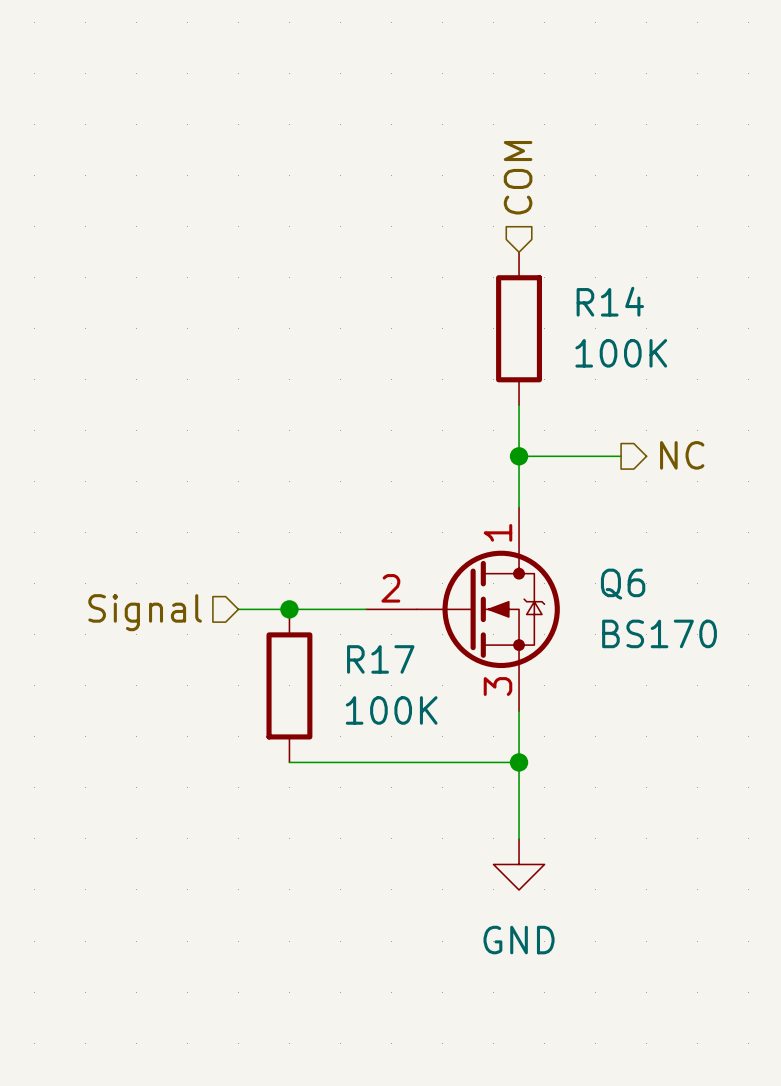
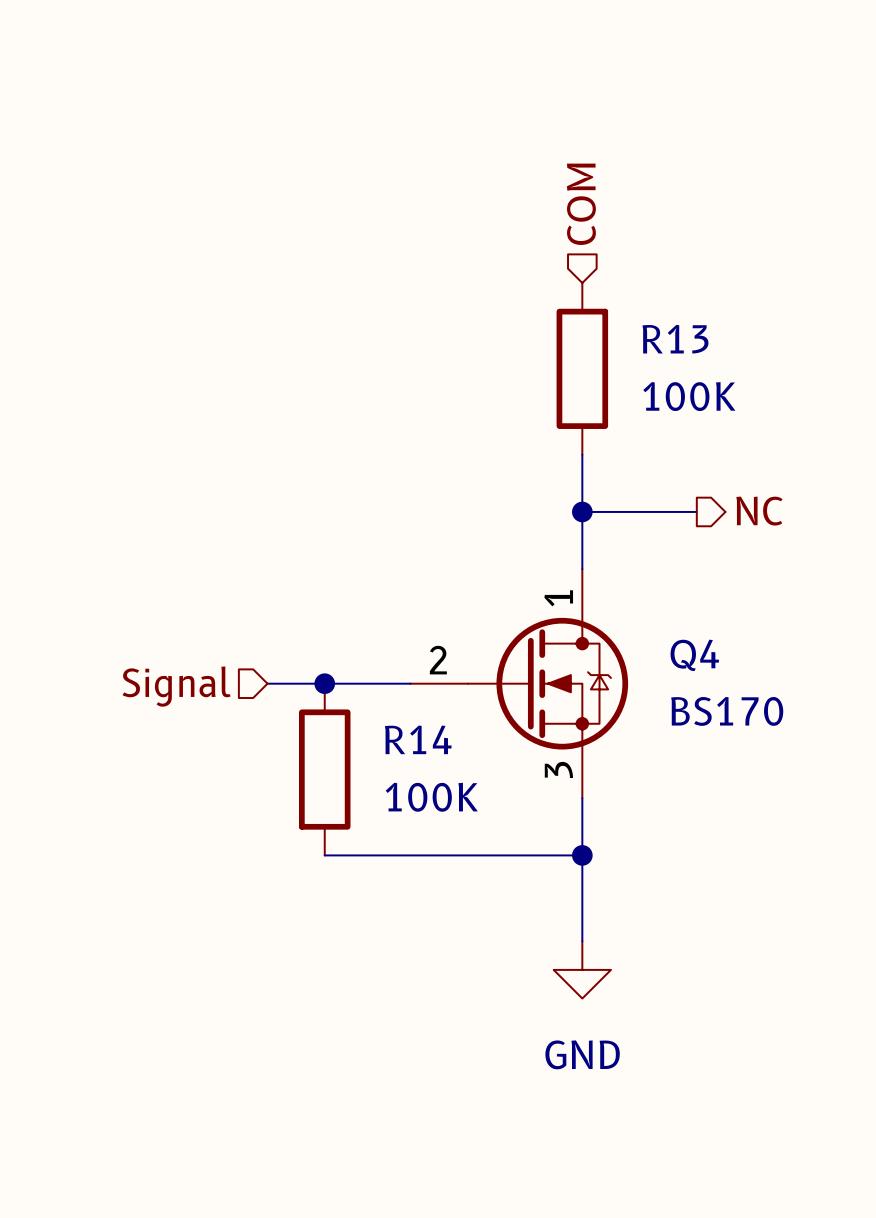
R14 name: R14 (610, 301) -> R13 (675, 339)
Q6 name: Q6 (623, 584) -> Q4 (694, 655)
R17 name: R17 (380, 659) -> R14 (418, 739)

